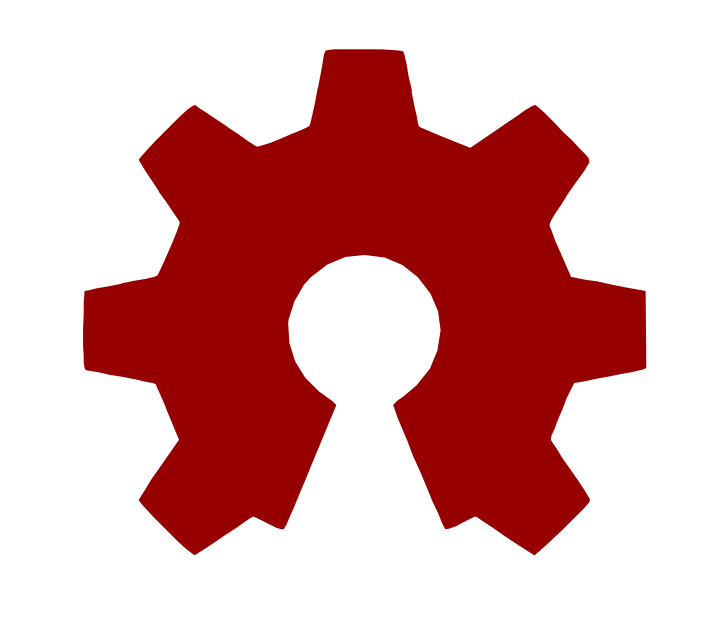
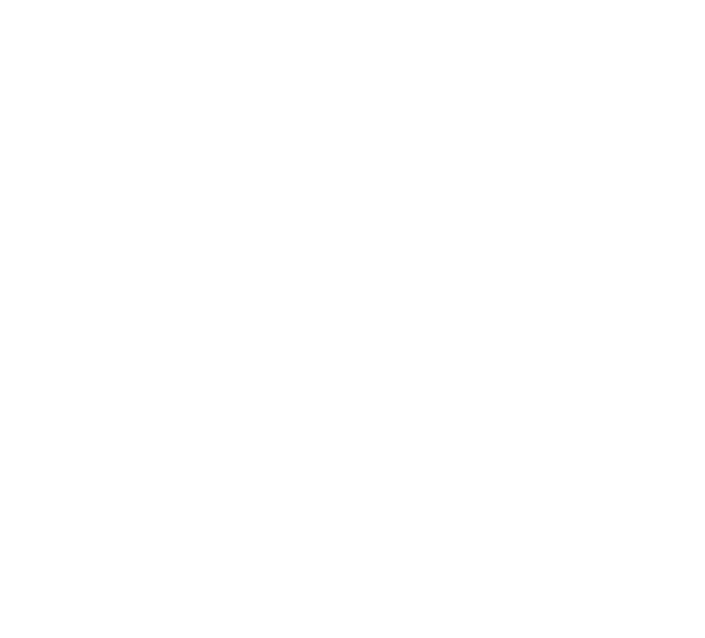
power symbol: (364, 302) -> none

